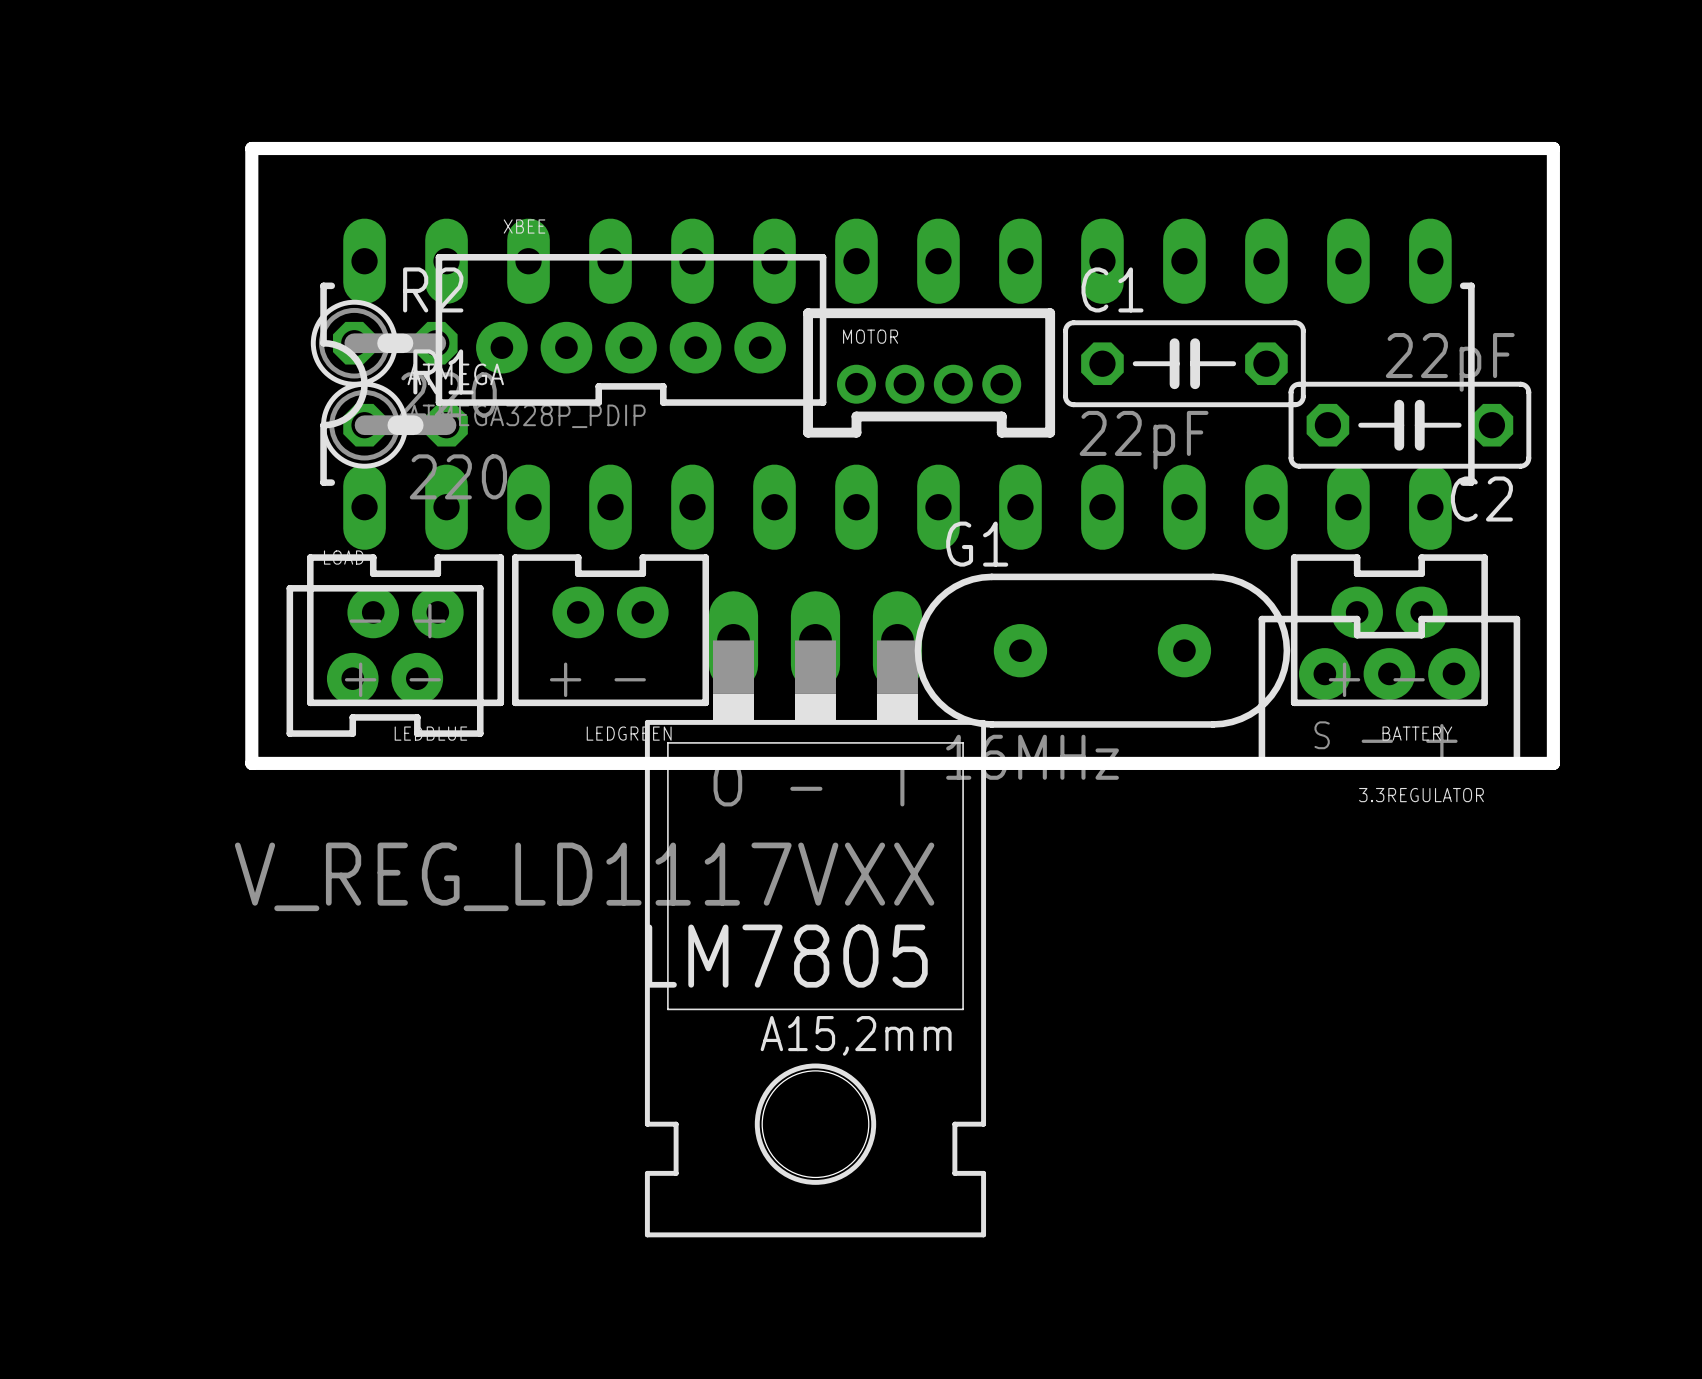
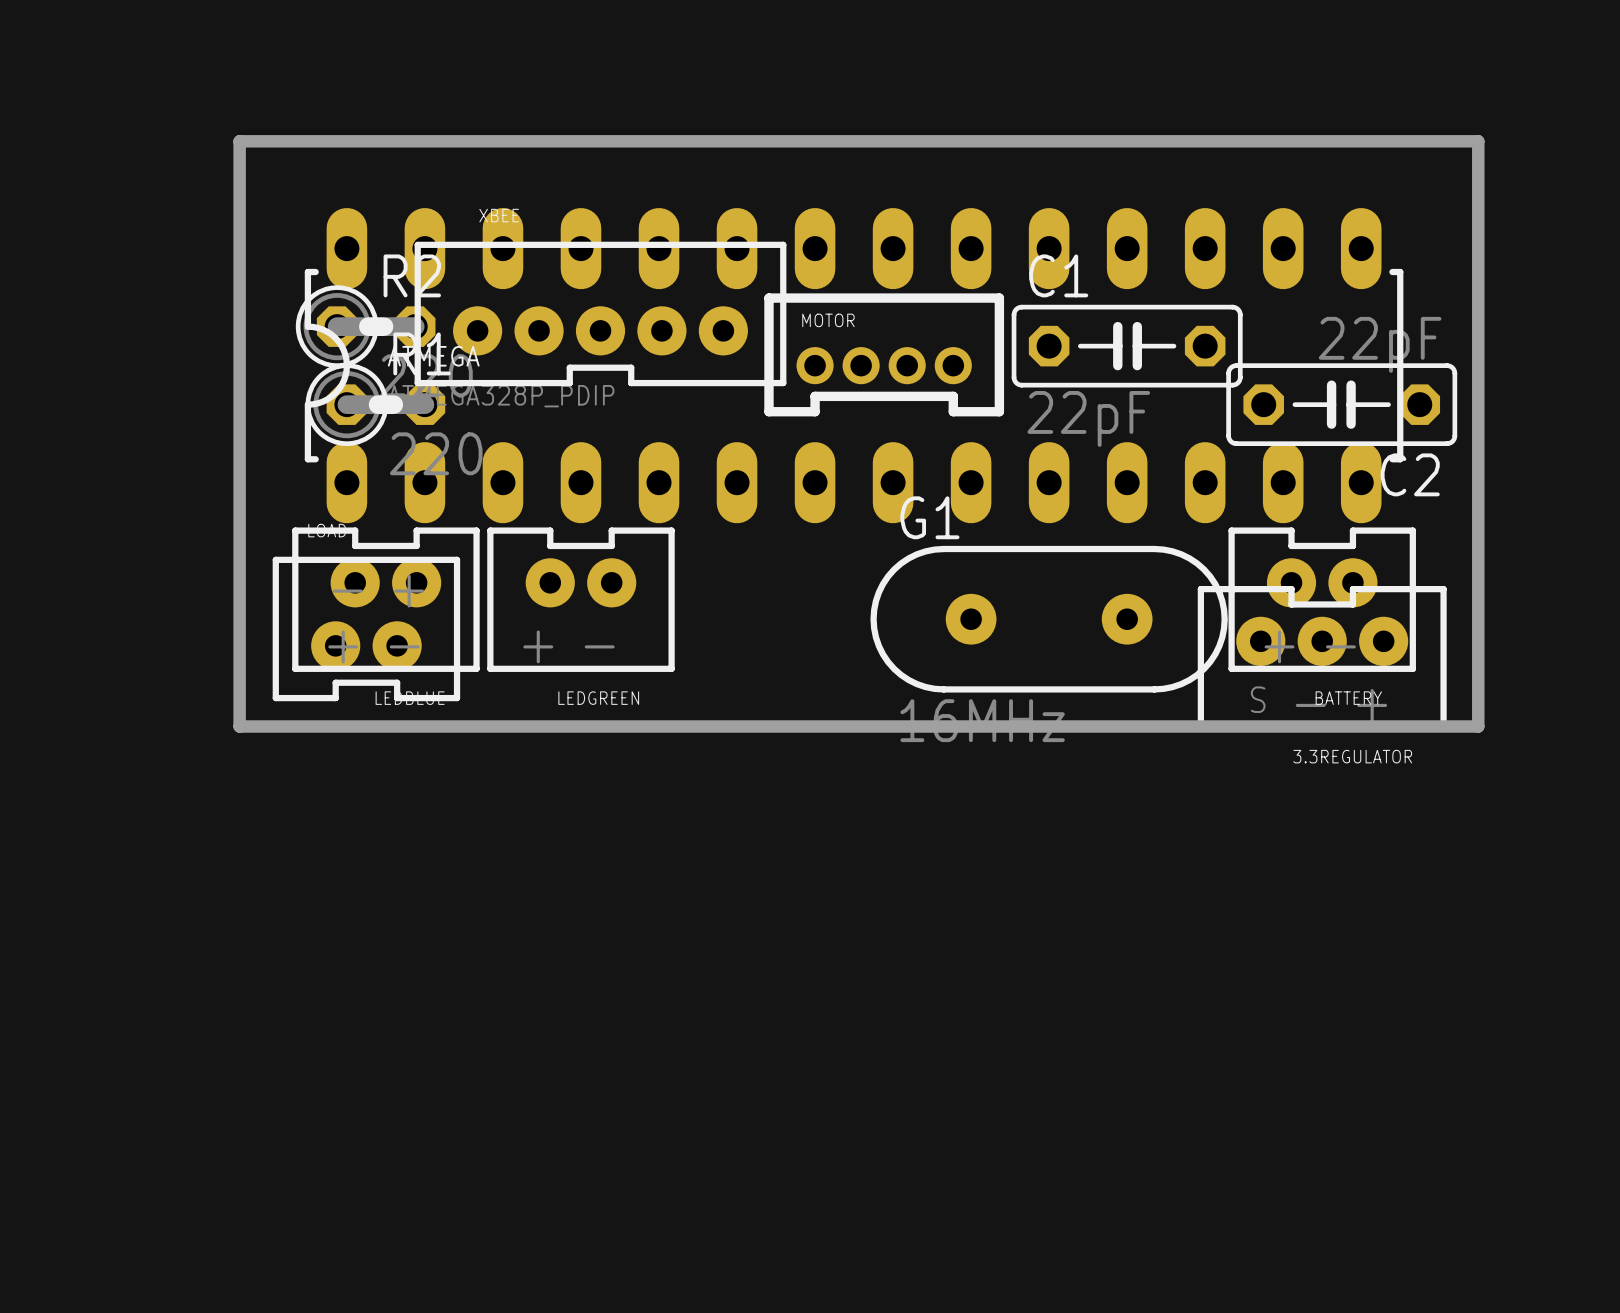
LM7805: V_REG_LD1117VXX (815, 914) -> none

